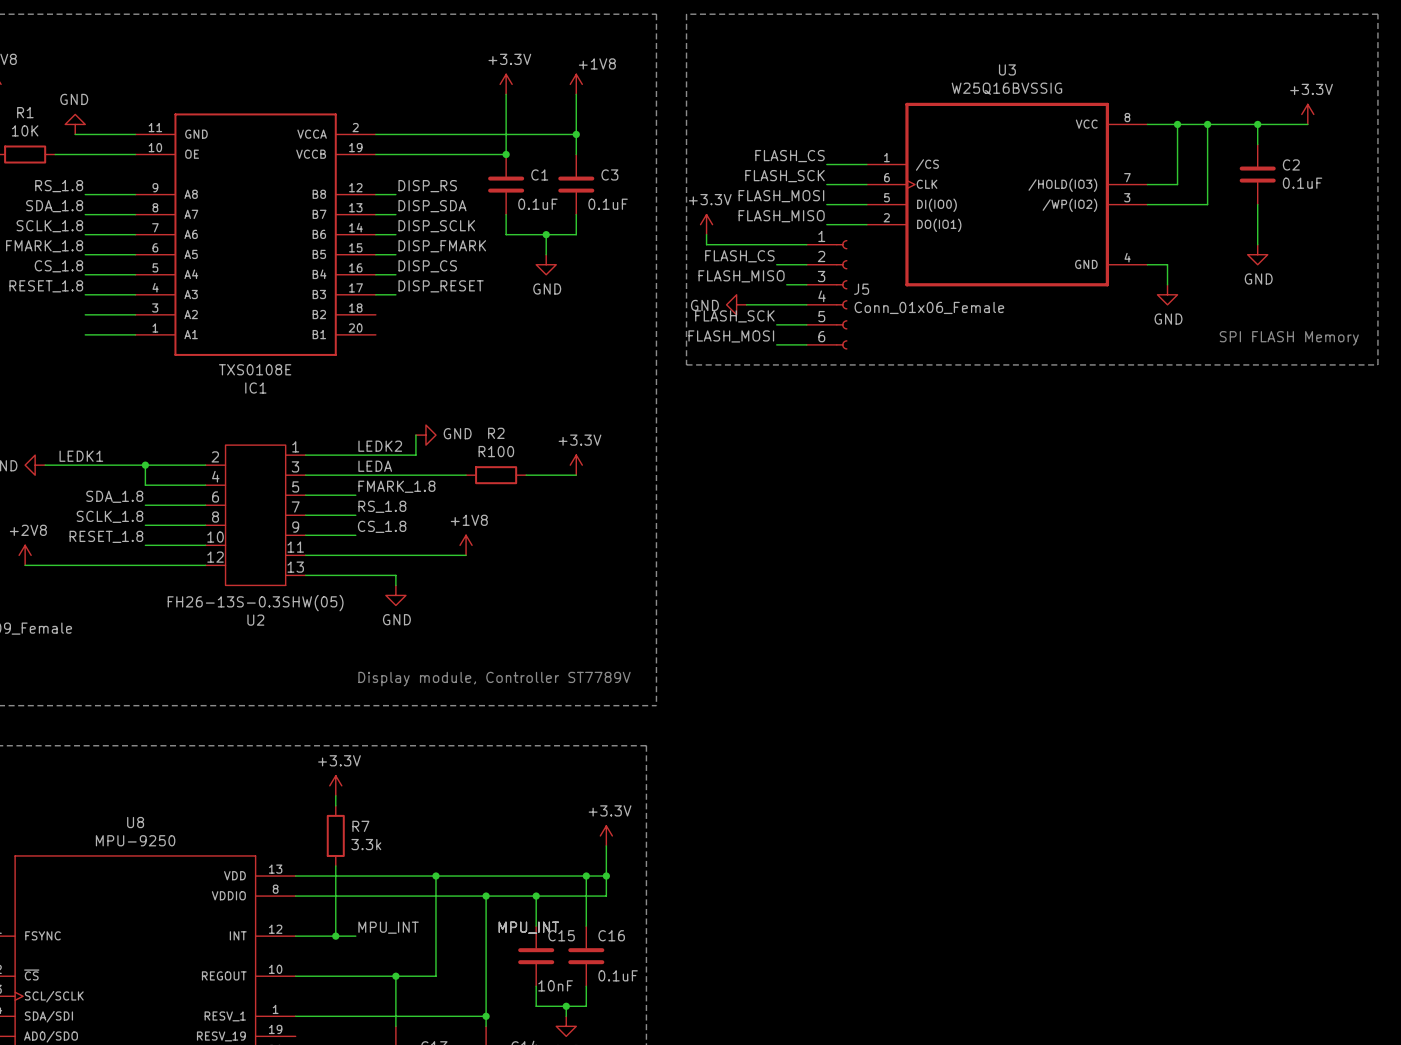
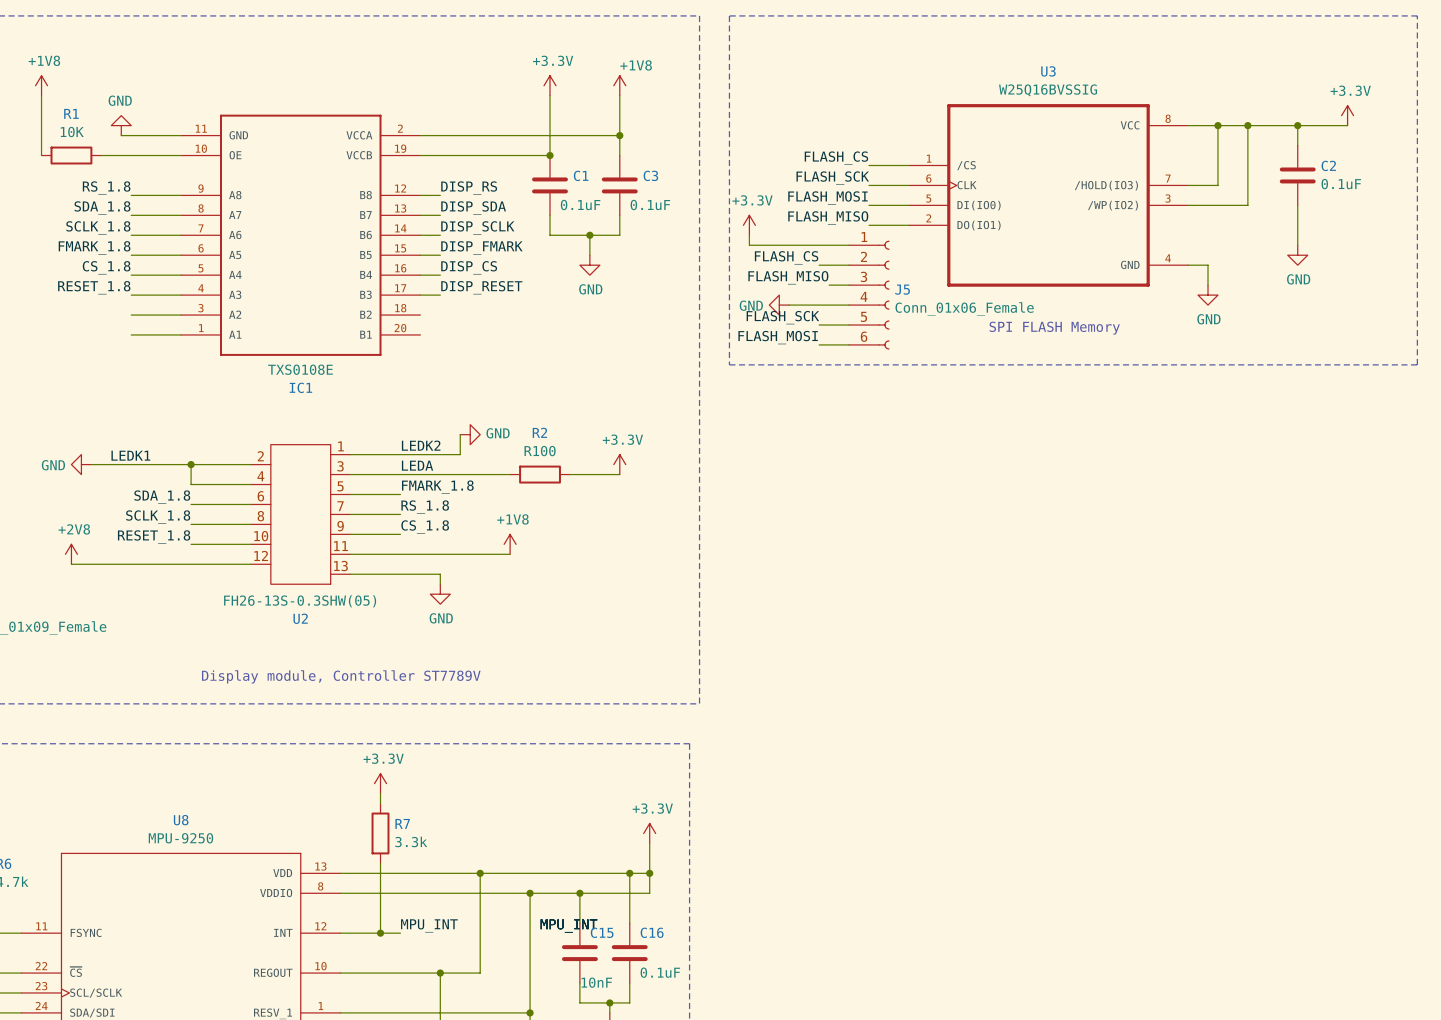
text: none -> SPI FLASH Memory (1054, 328)
text: SPI FLASH Memory (1289, 338) -> none
text: none -> Display module, Controller ST7789V (341, 676)
text: Display module, Controller ST7789V (494, 679) -> none

